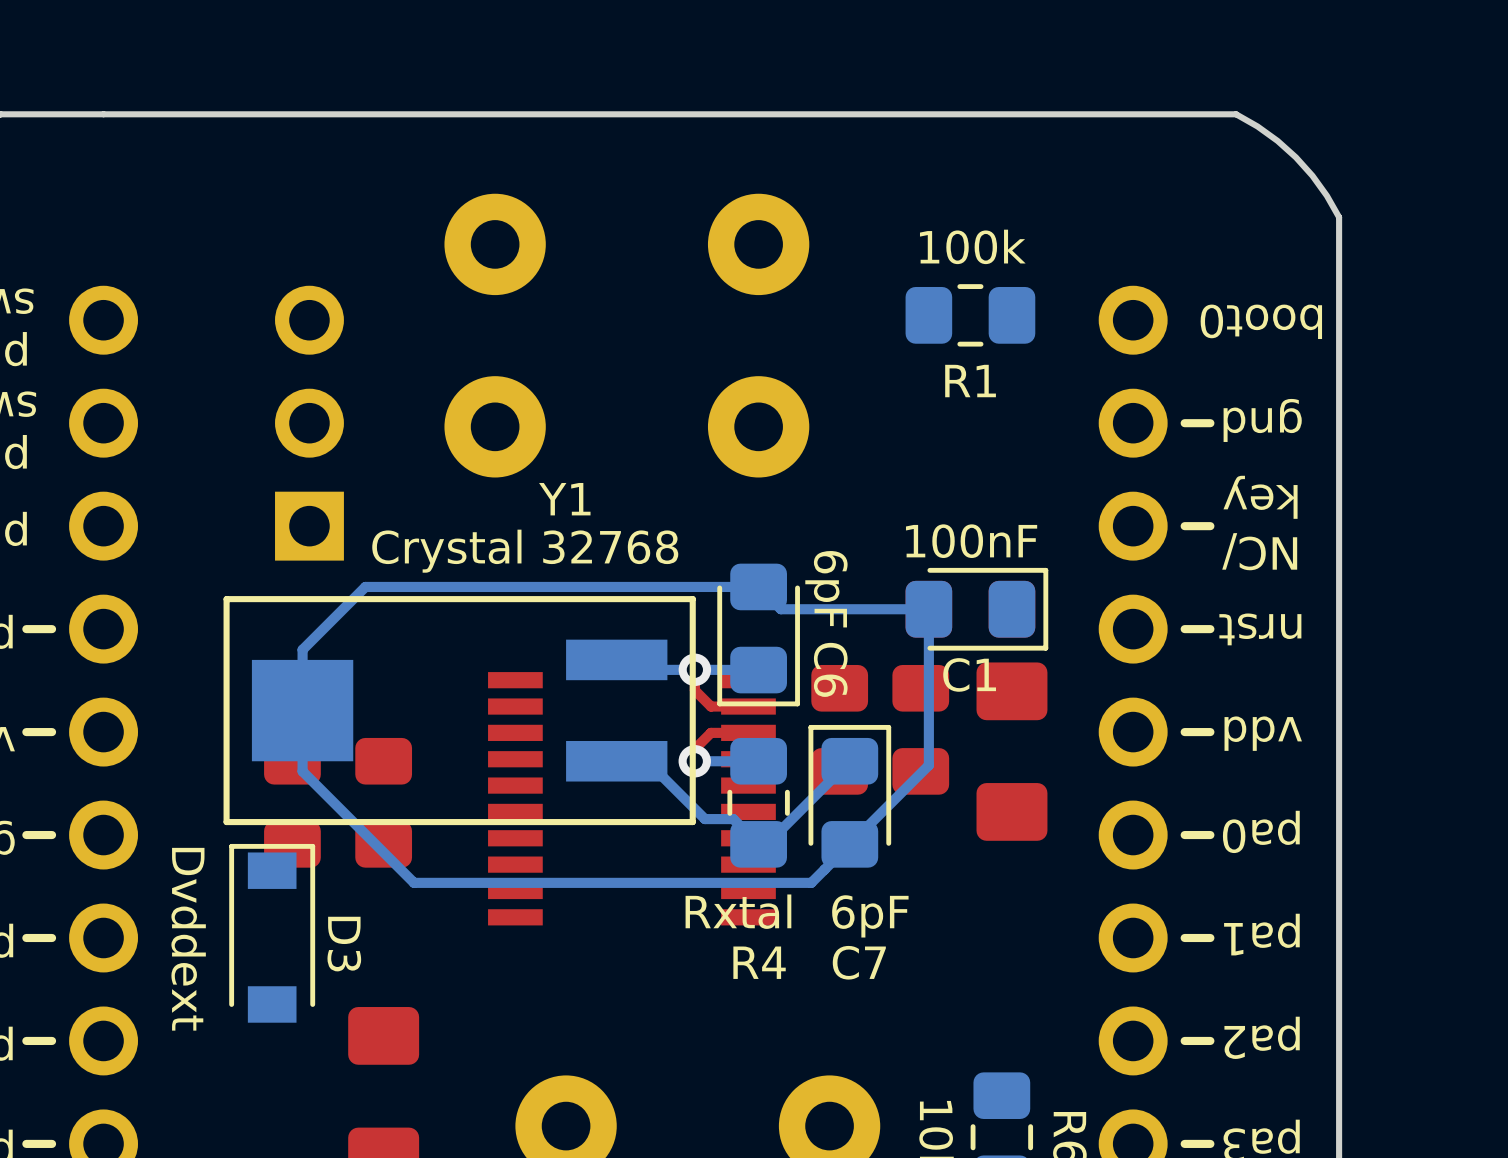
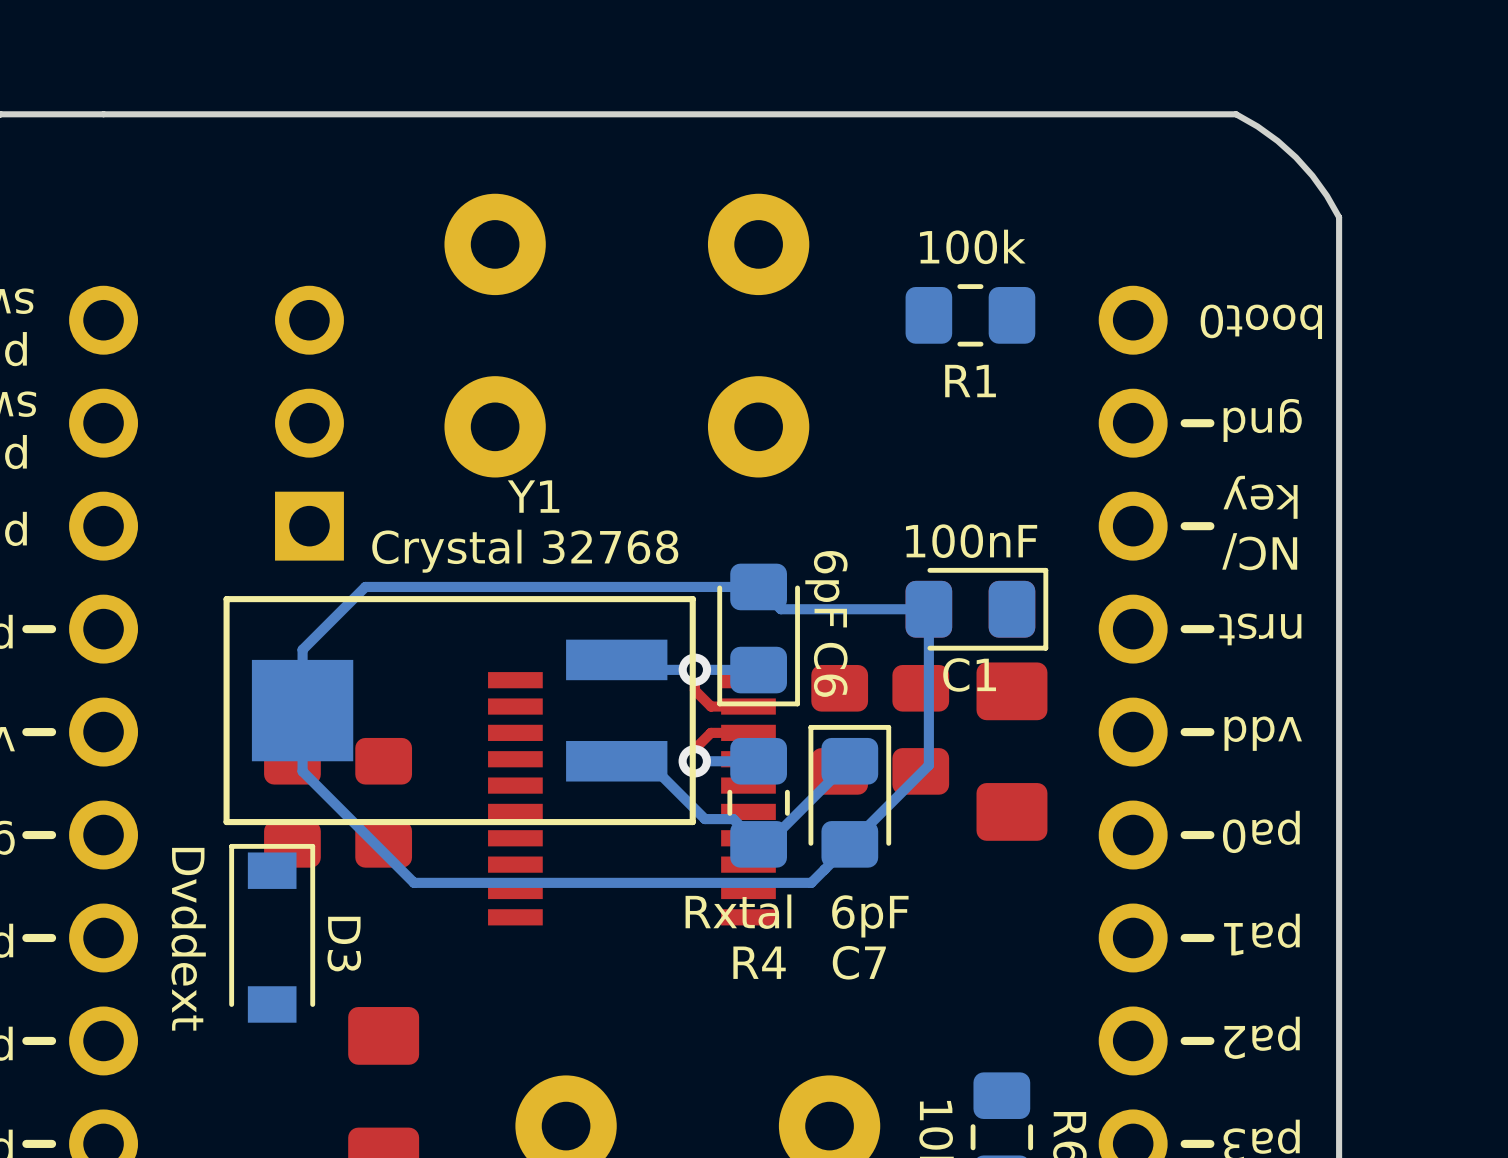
Y1 name position: Y1 (564, 499) -> Y1 (533, 496)

